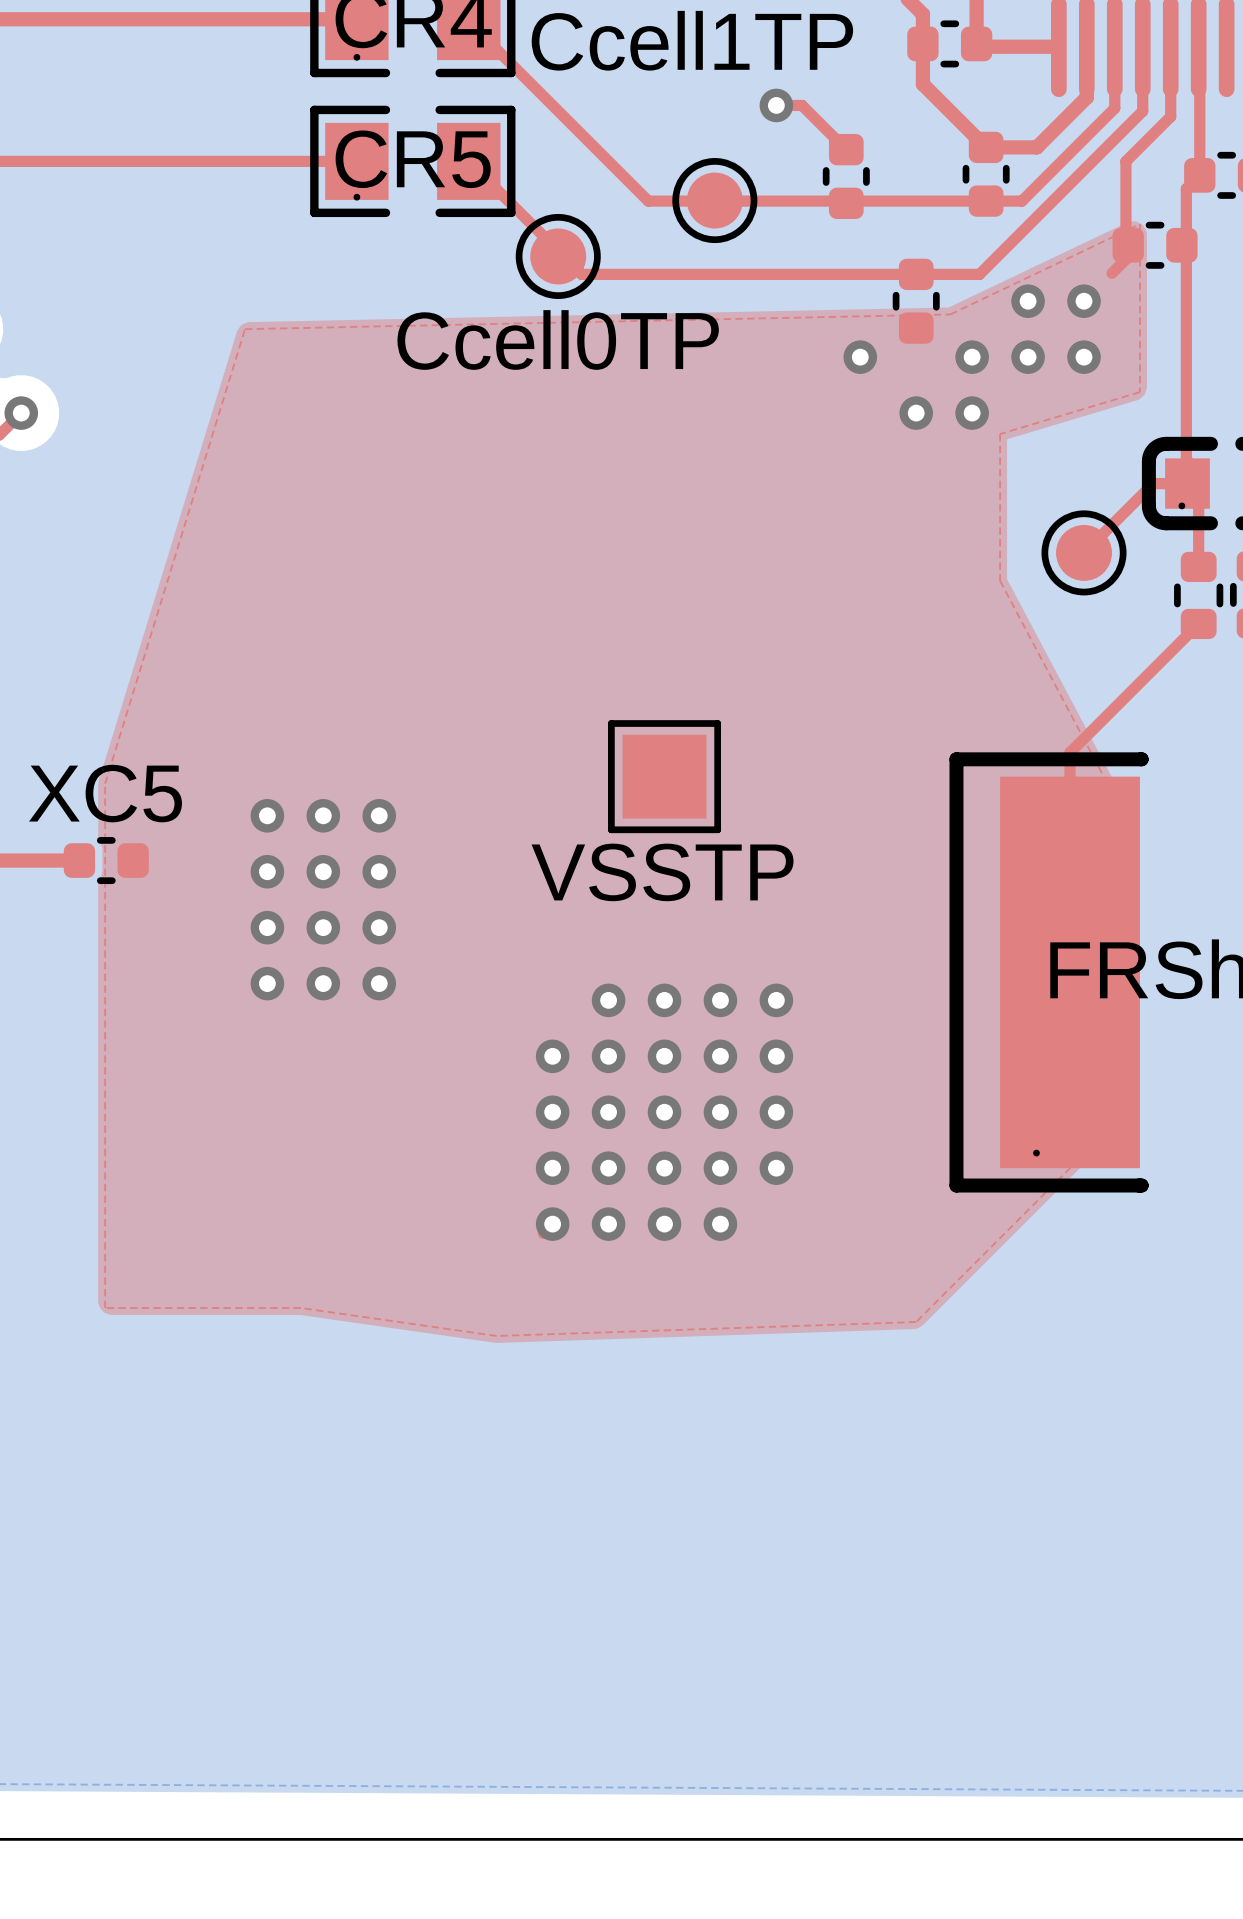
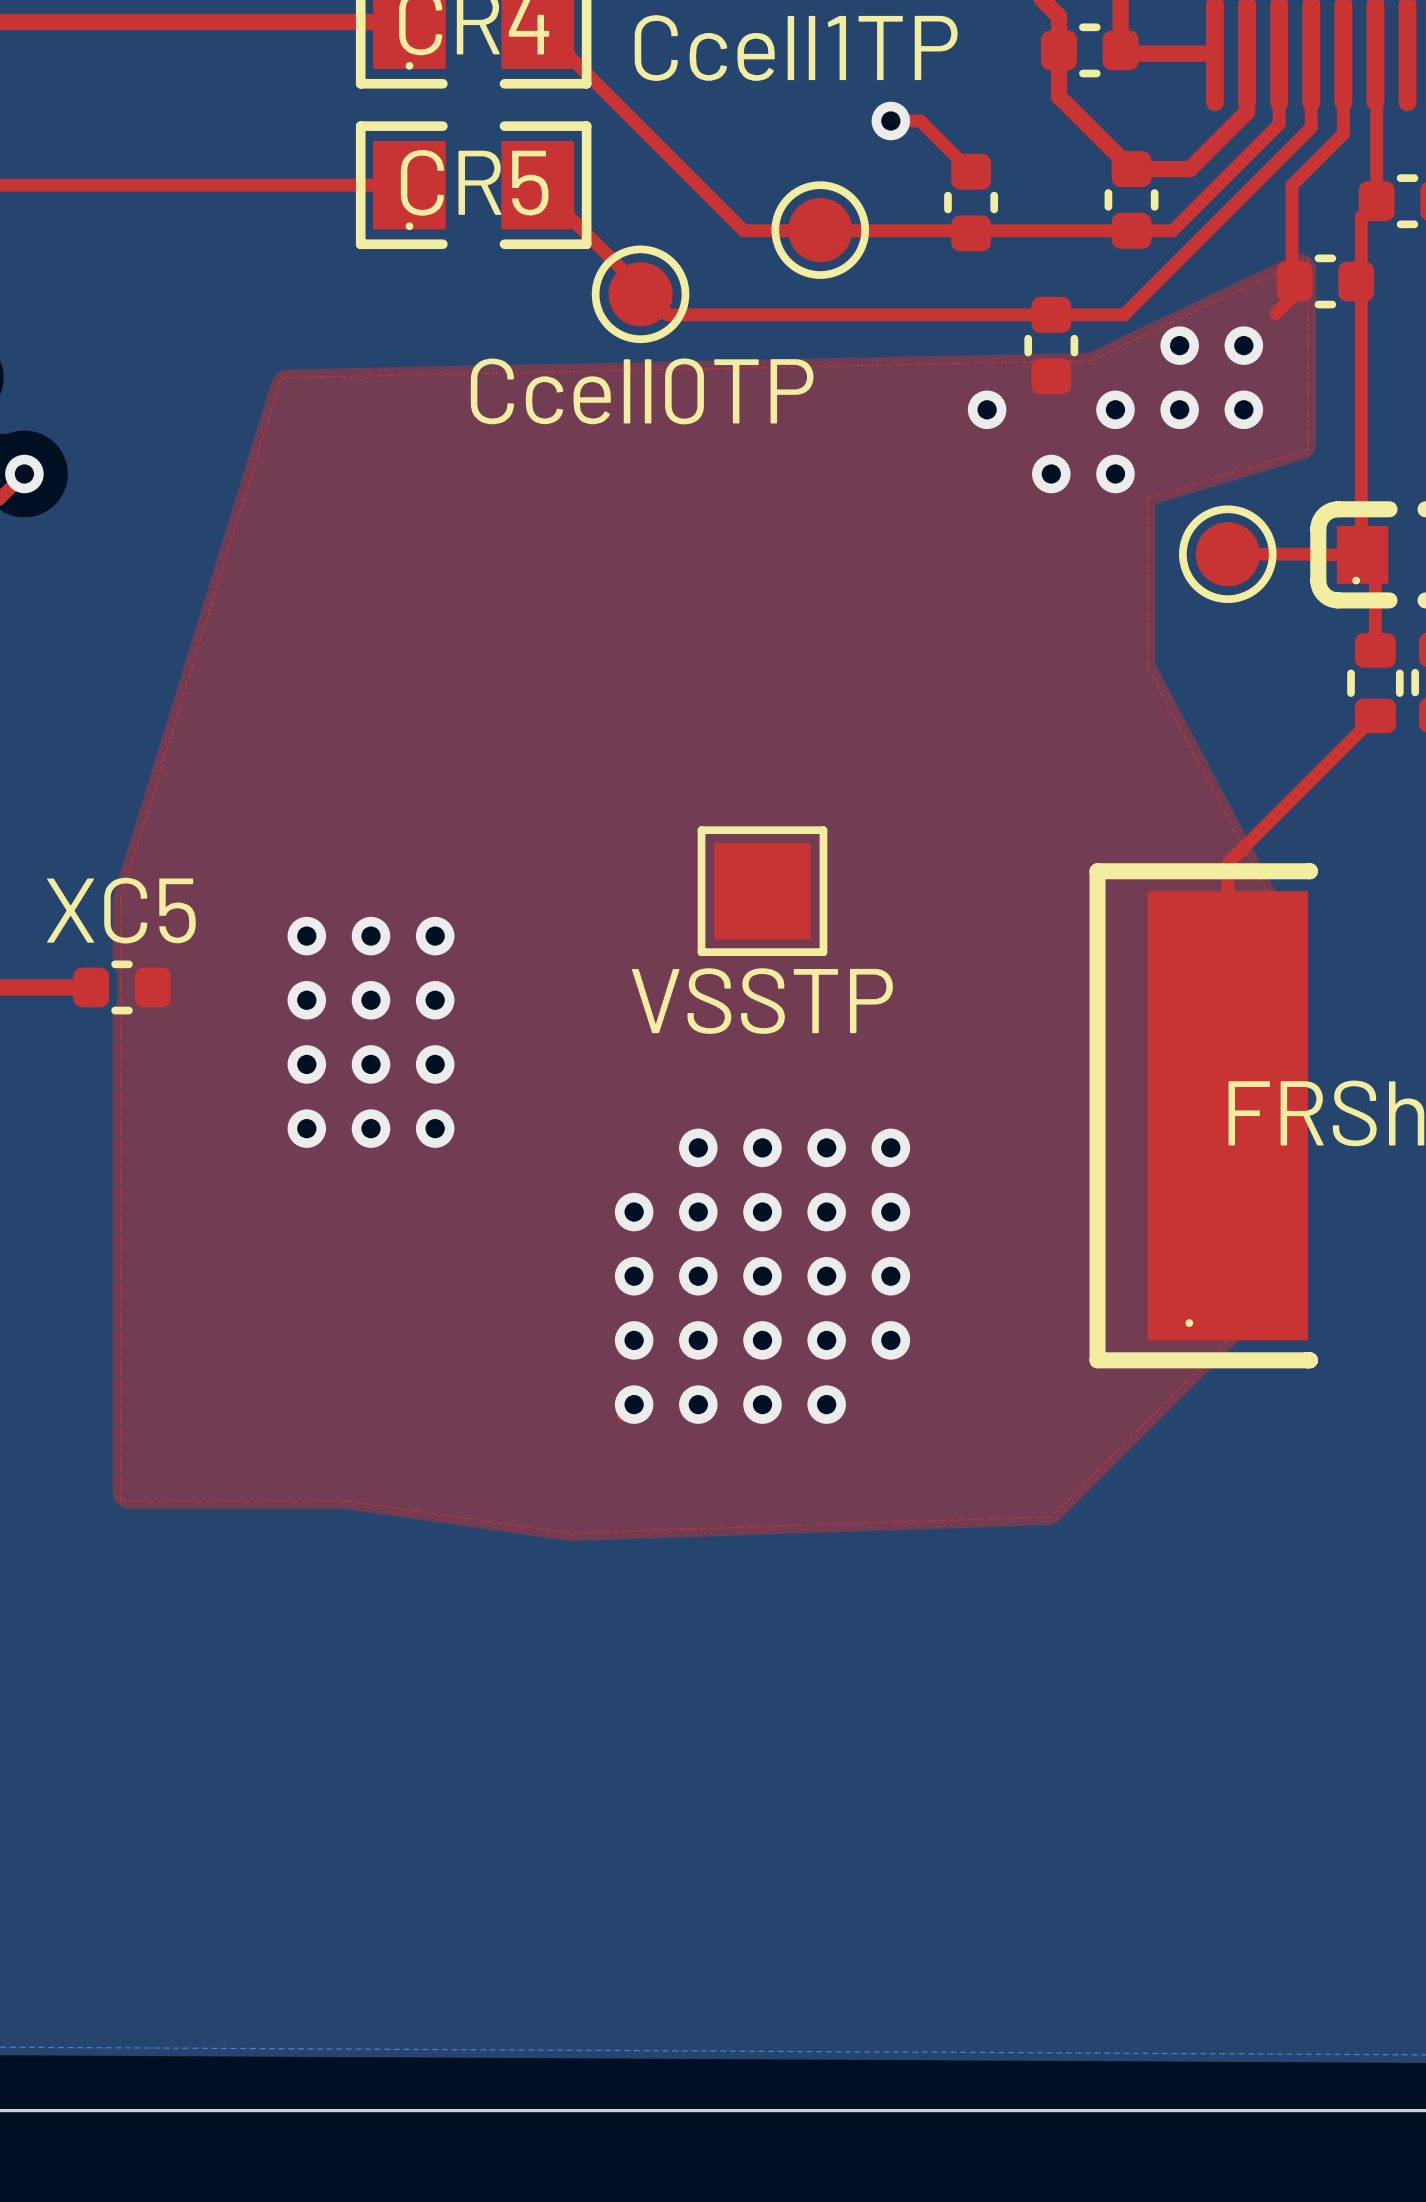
top track: (1153, 483) (1084, 552) -> (1324, 554) (1227, 554)
part position: (1084, 552) -> (1227, 554)

